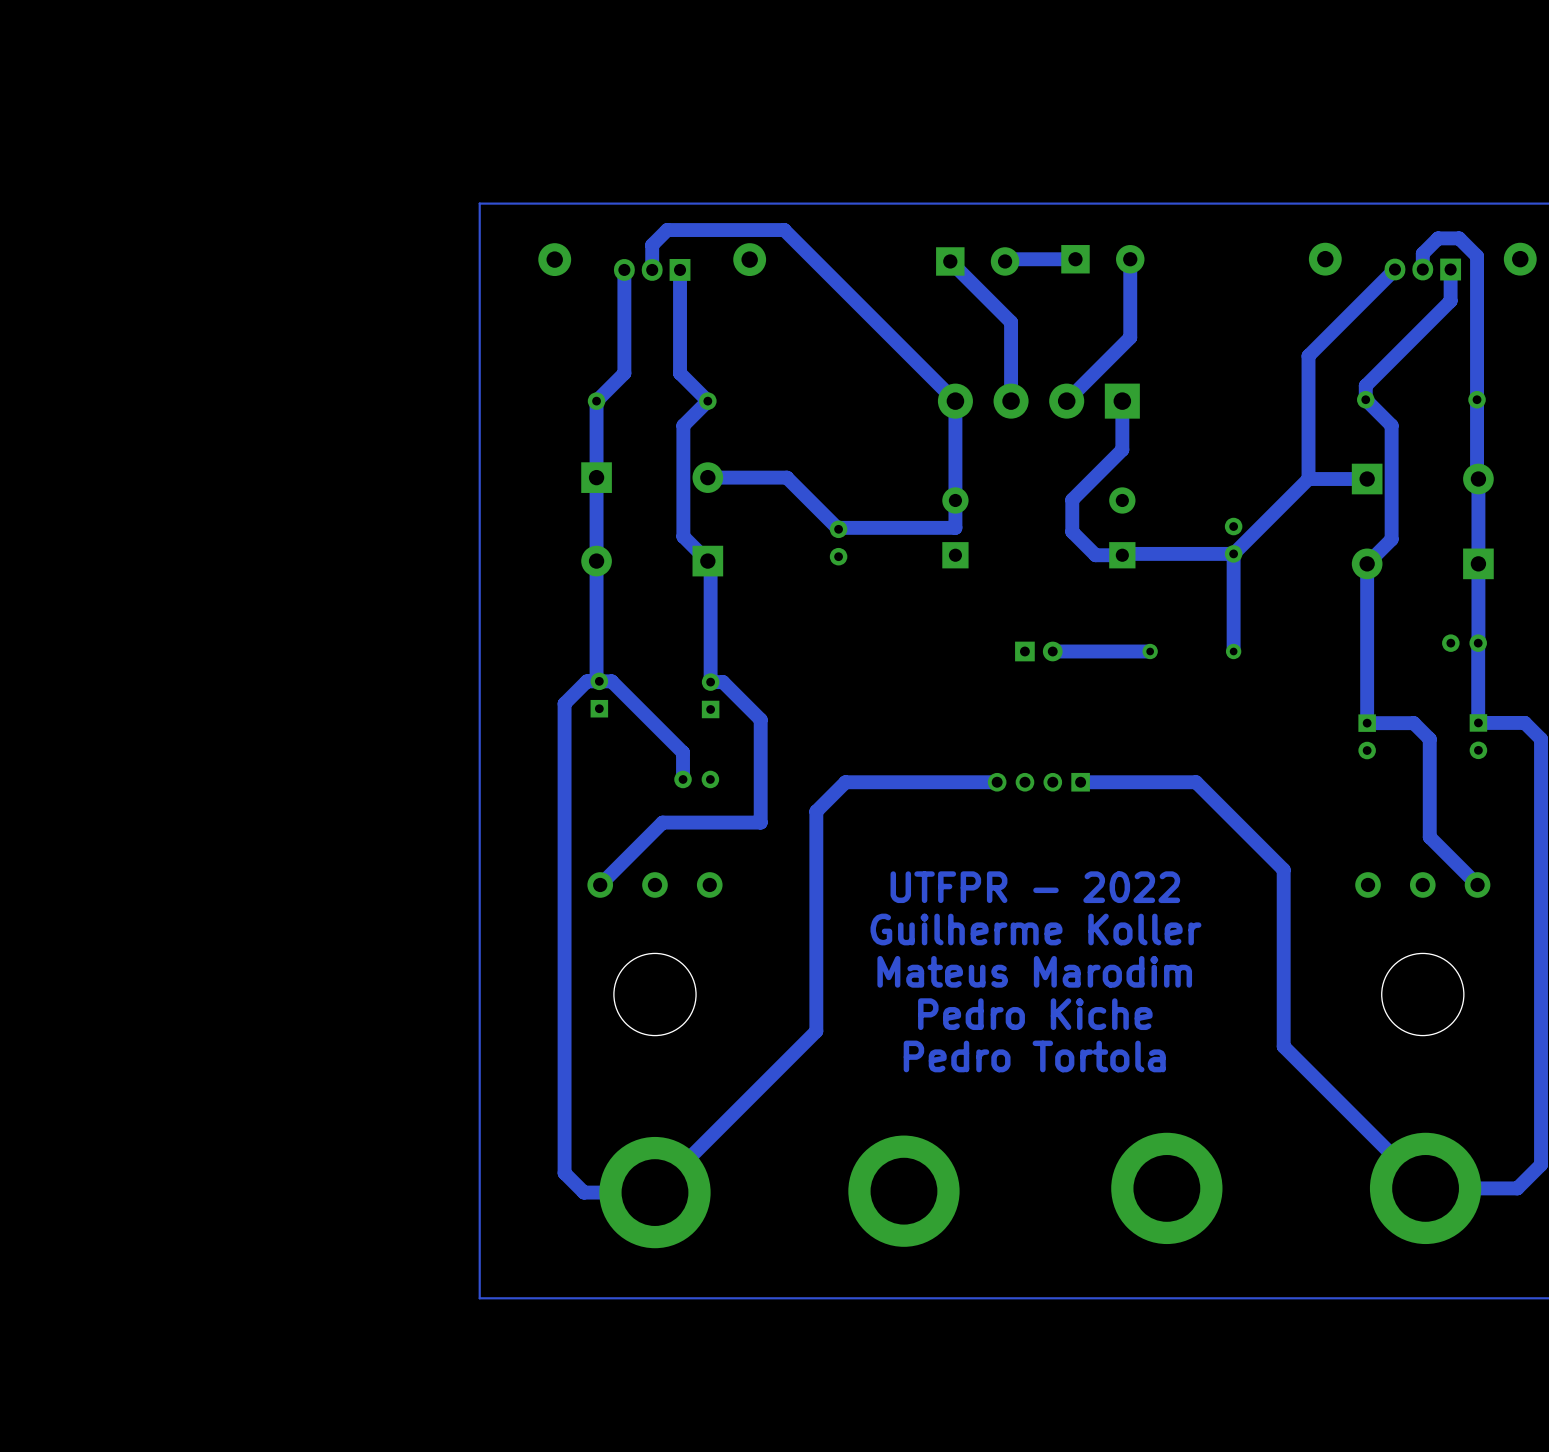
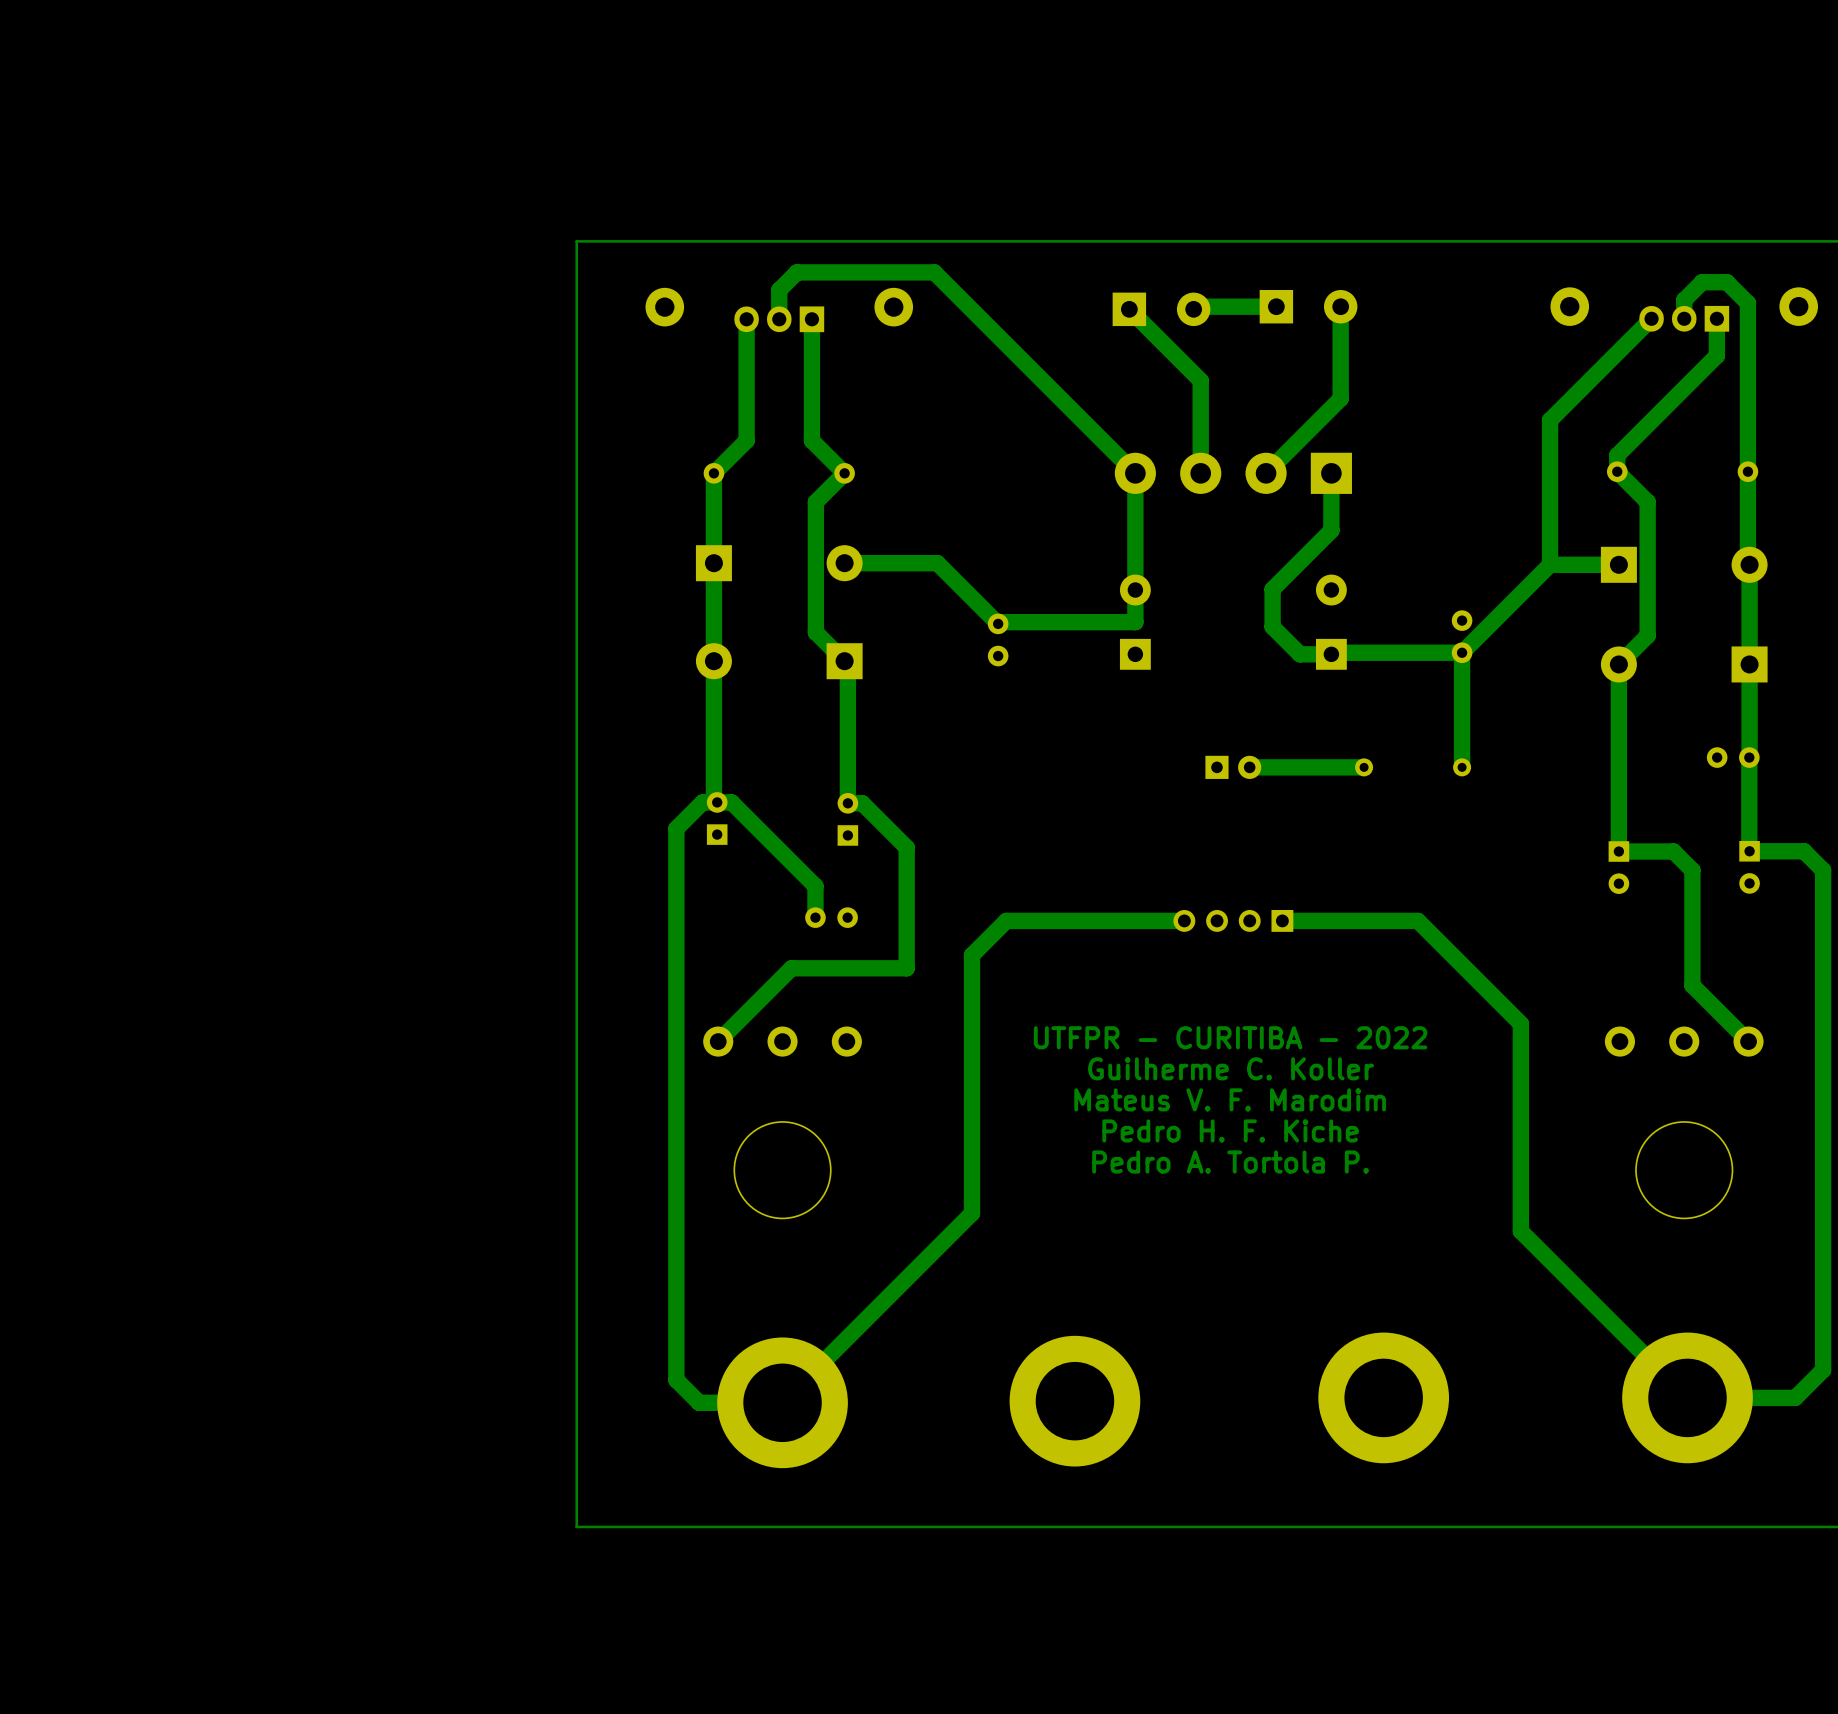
text: UTFPR - 2022 (1035, 887) -> UTFPR - CURITIBA - 2022 (1230, 1037)
text: none -> Guilherme C. Koller (1231, 1068)
text: Guilherme Koller (1035, 929) -> Mateus V. F. Marodim (1230, 1099)
text: none -> Pedro H. F. Kiche (1230, 1130)
text: Mateus Marodim (1034, 971) -> none
text: none -> Pedro A. Tortola P. (1230, 1162)
text: Pedro Kiche (1035, 1014) -> none
text: Pedro Tortola (1034, 1056) -> none

